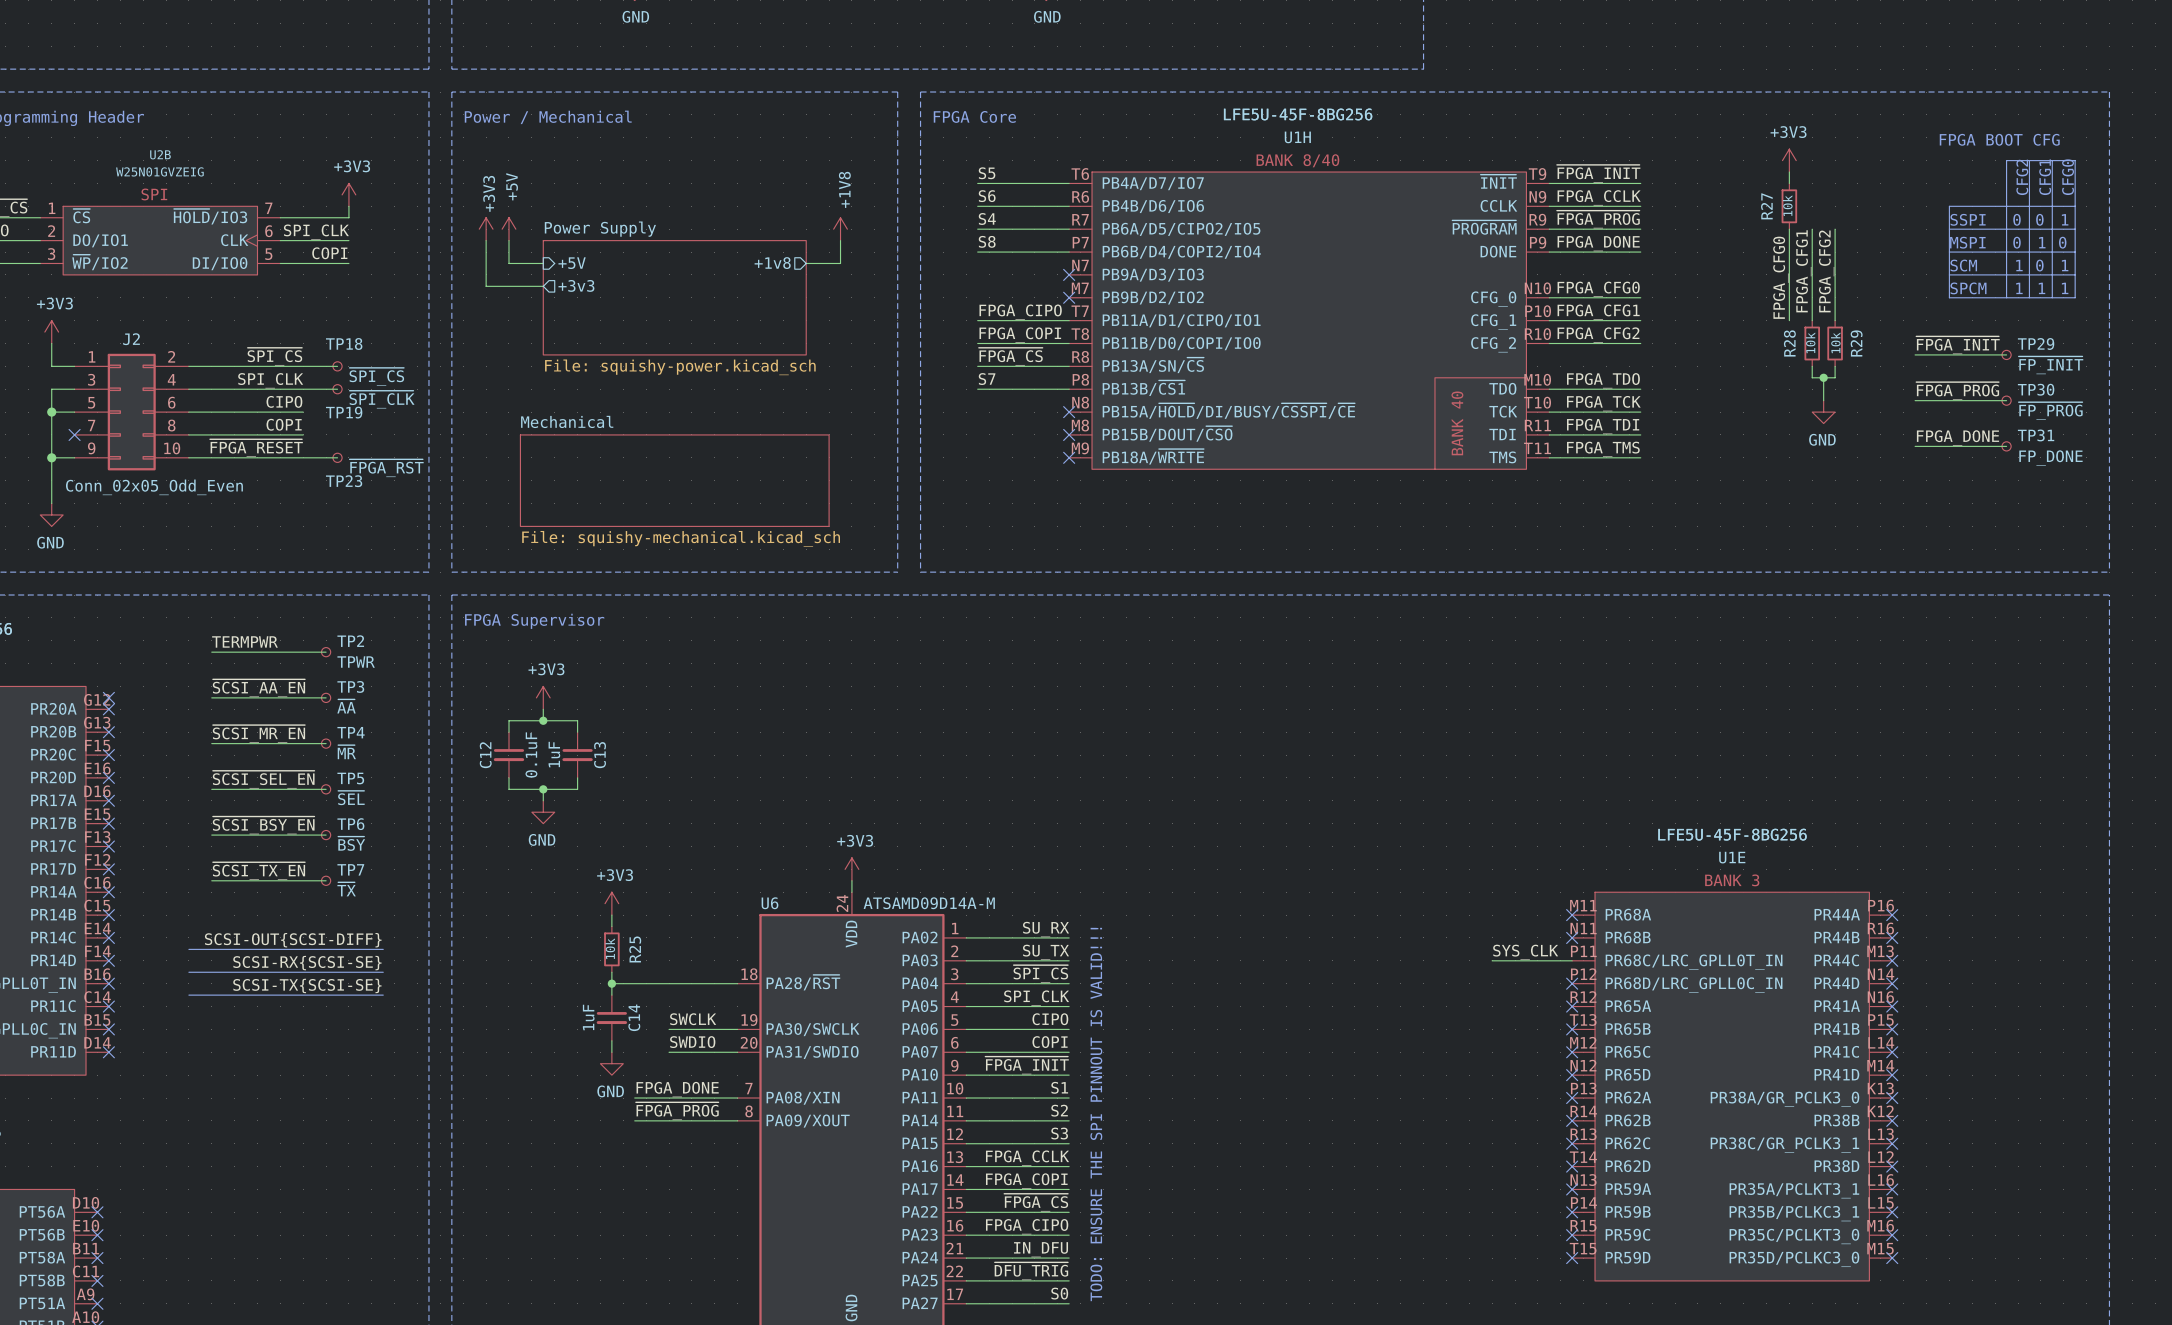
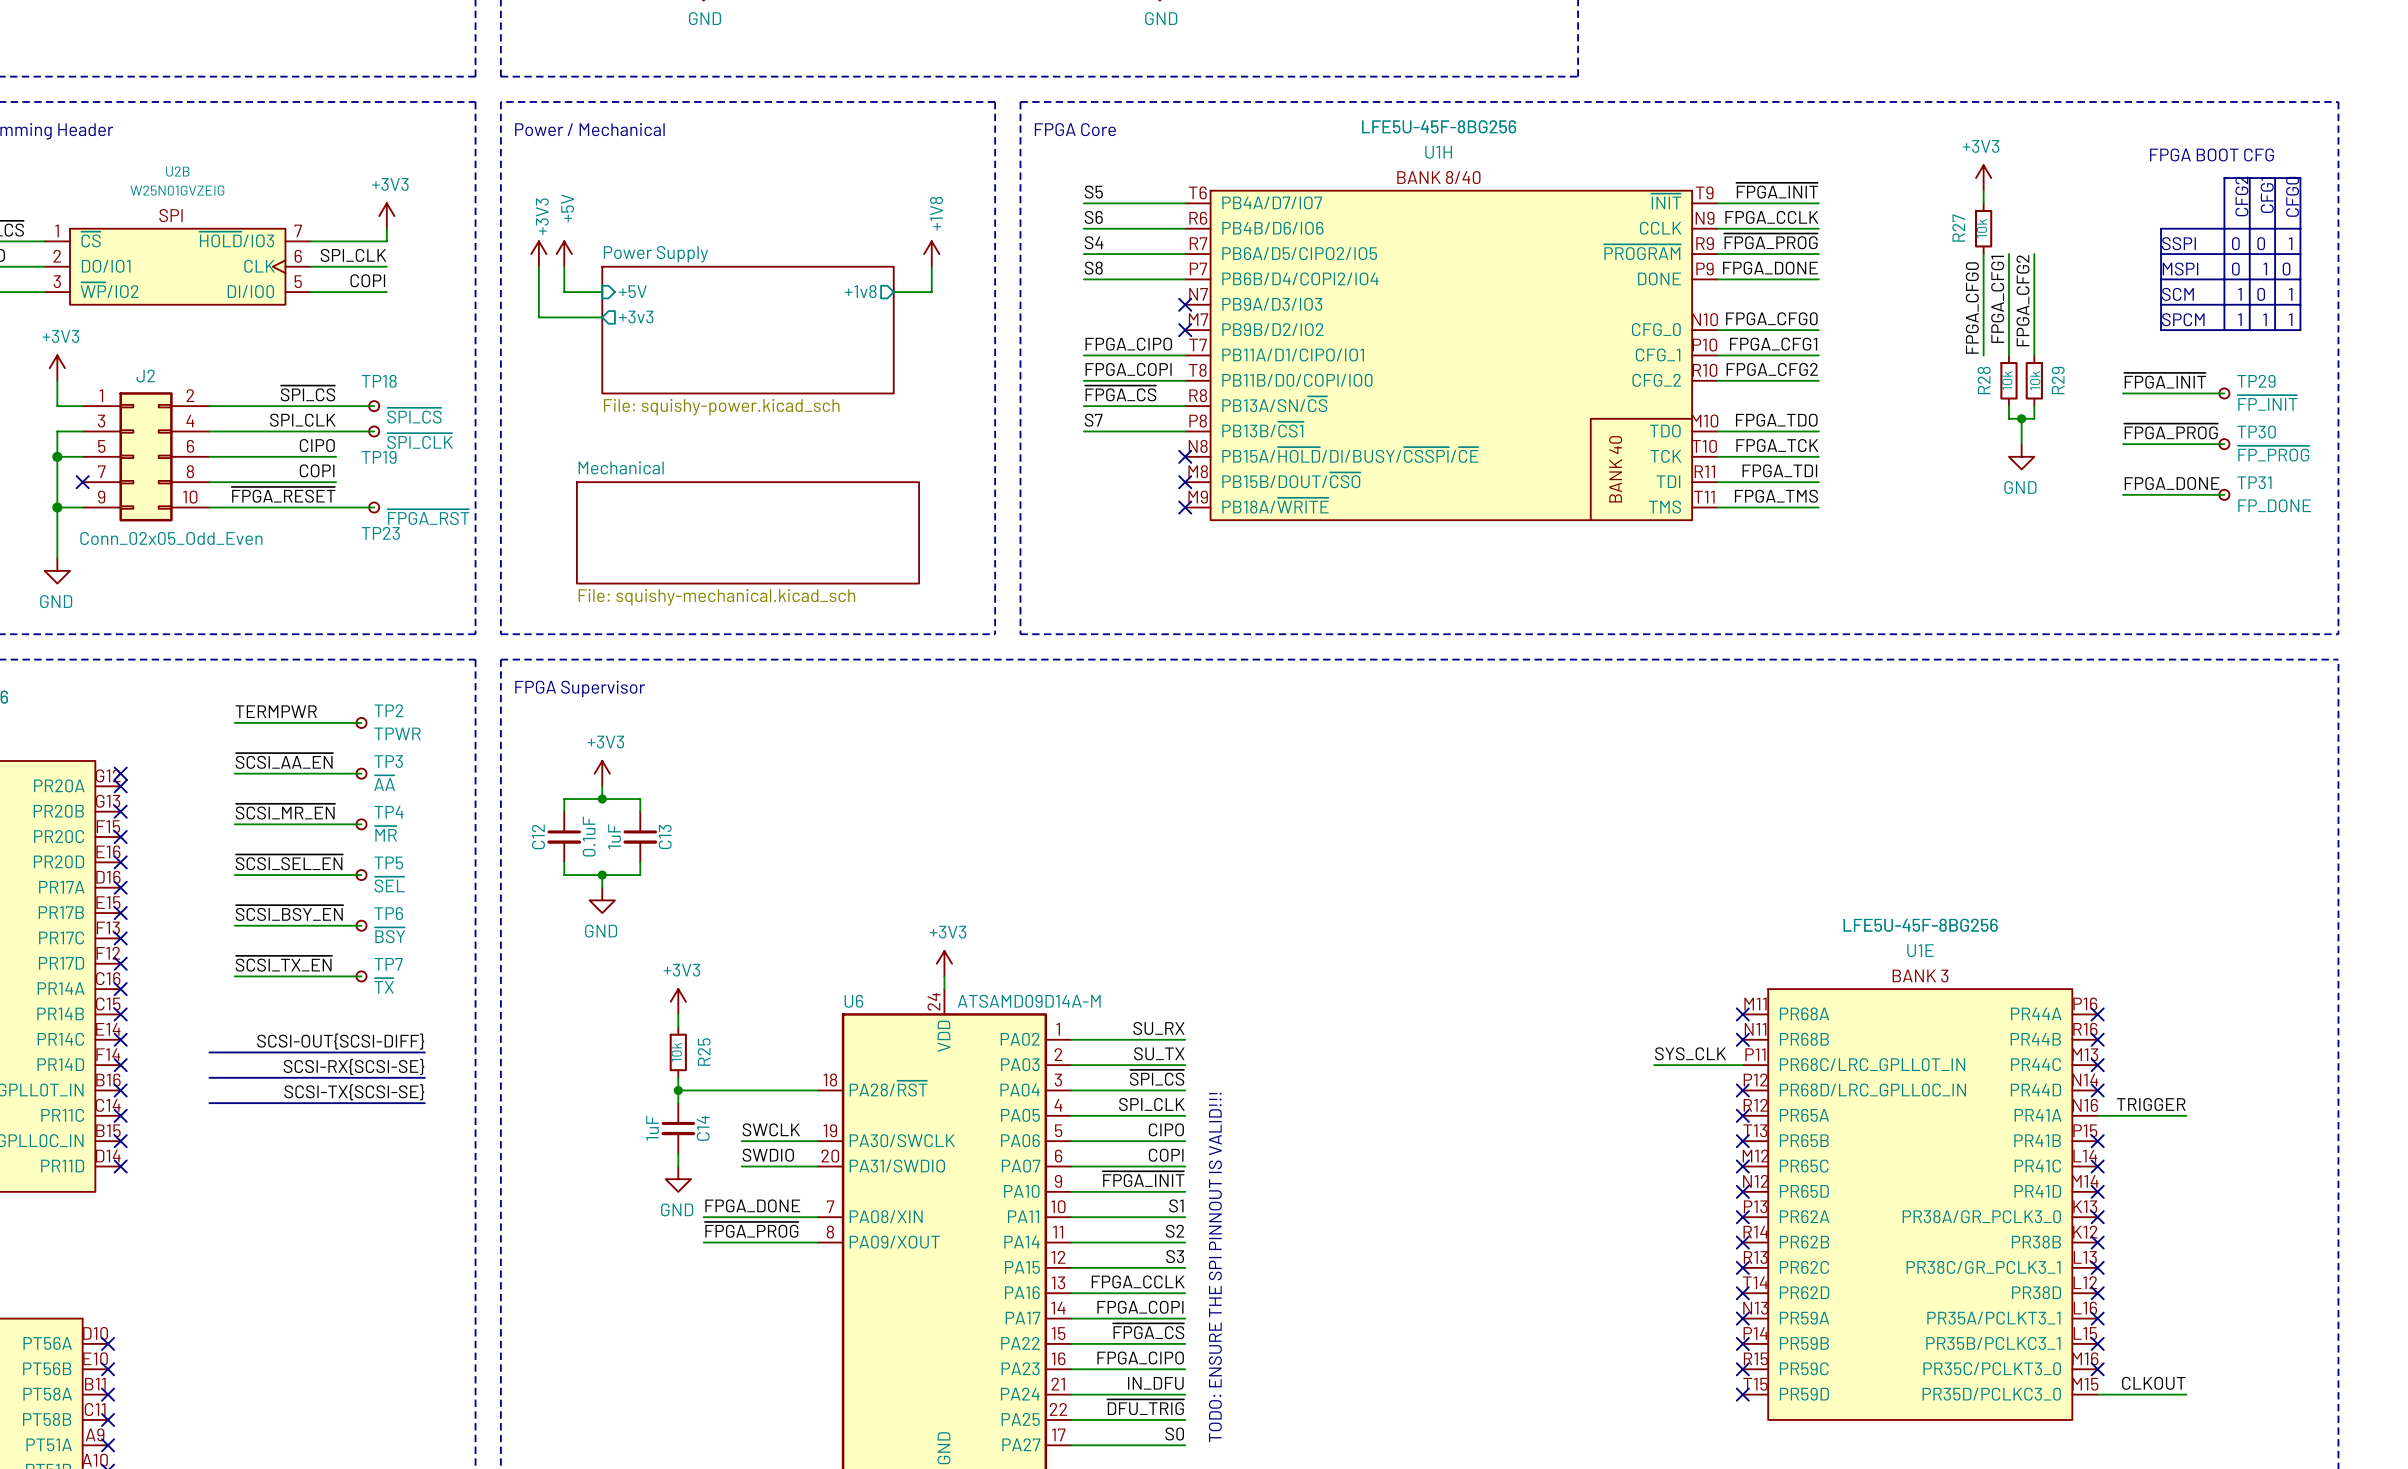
label: none -> TRIGGER (2151, 1104)
wire: none -> (2097, 1115) (2186, 1115)
no-connect mark: (1892, 1006) -> none
label: none -> CLKOUT (2153, 1383)
wire: none -> (2097, 1394) (2186, 1394)
no-connect mark: (1892, 1258) -> none

